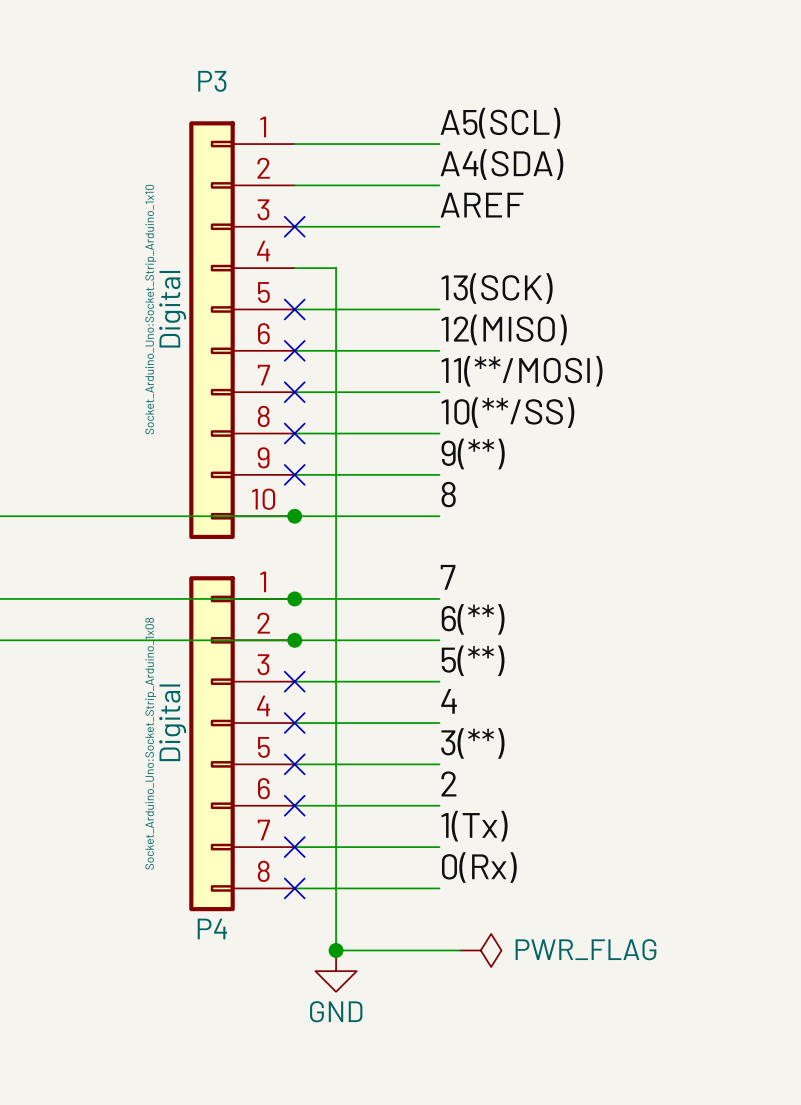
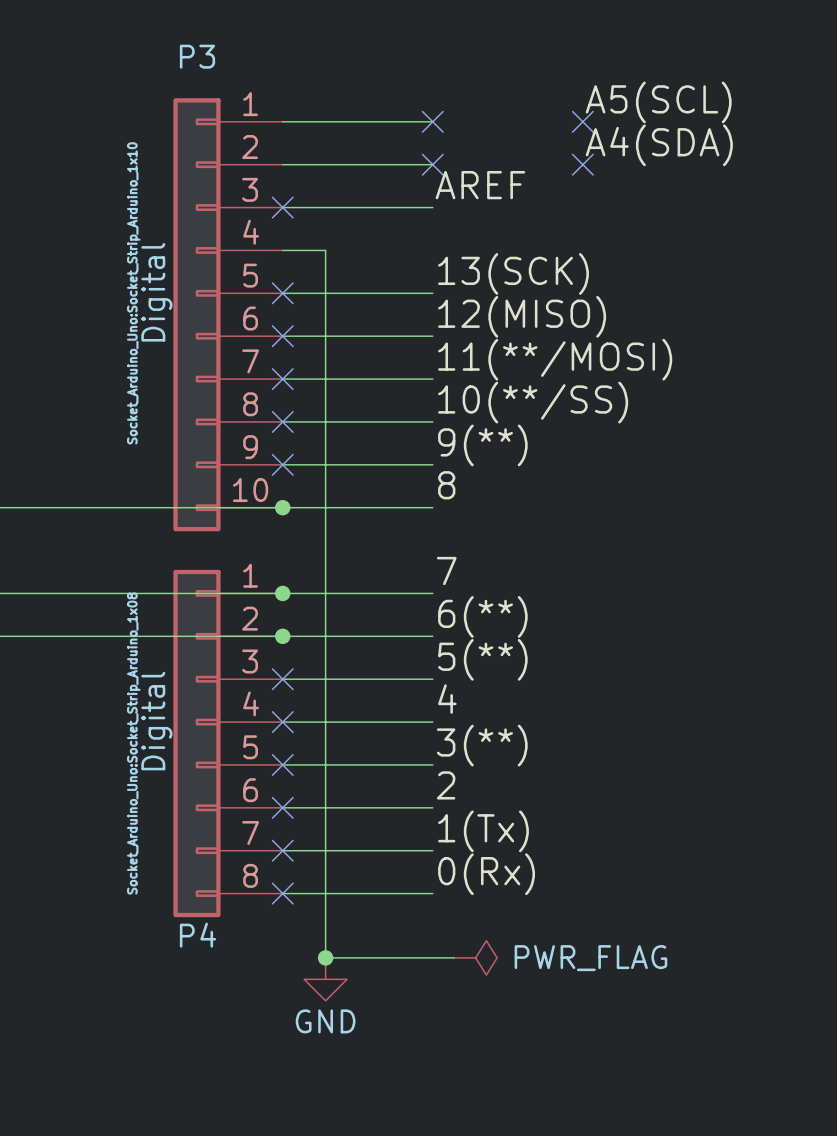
label position: A5(SCL) (500, 123) -> A5(SCL) (658, 102)
no-connect mark: none -> (432, 121)
no-connect mark: none -> (582, 121)
label position: A4(SDA) (501, 164) -> A4(SDA) (659, 145)
no-connect mark: none -> (432, 164)
no-connect mark: none -> (582, 164)

